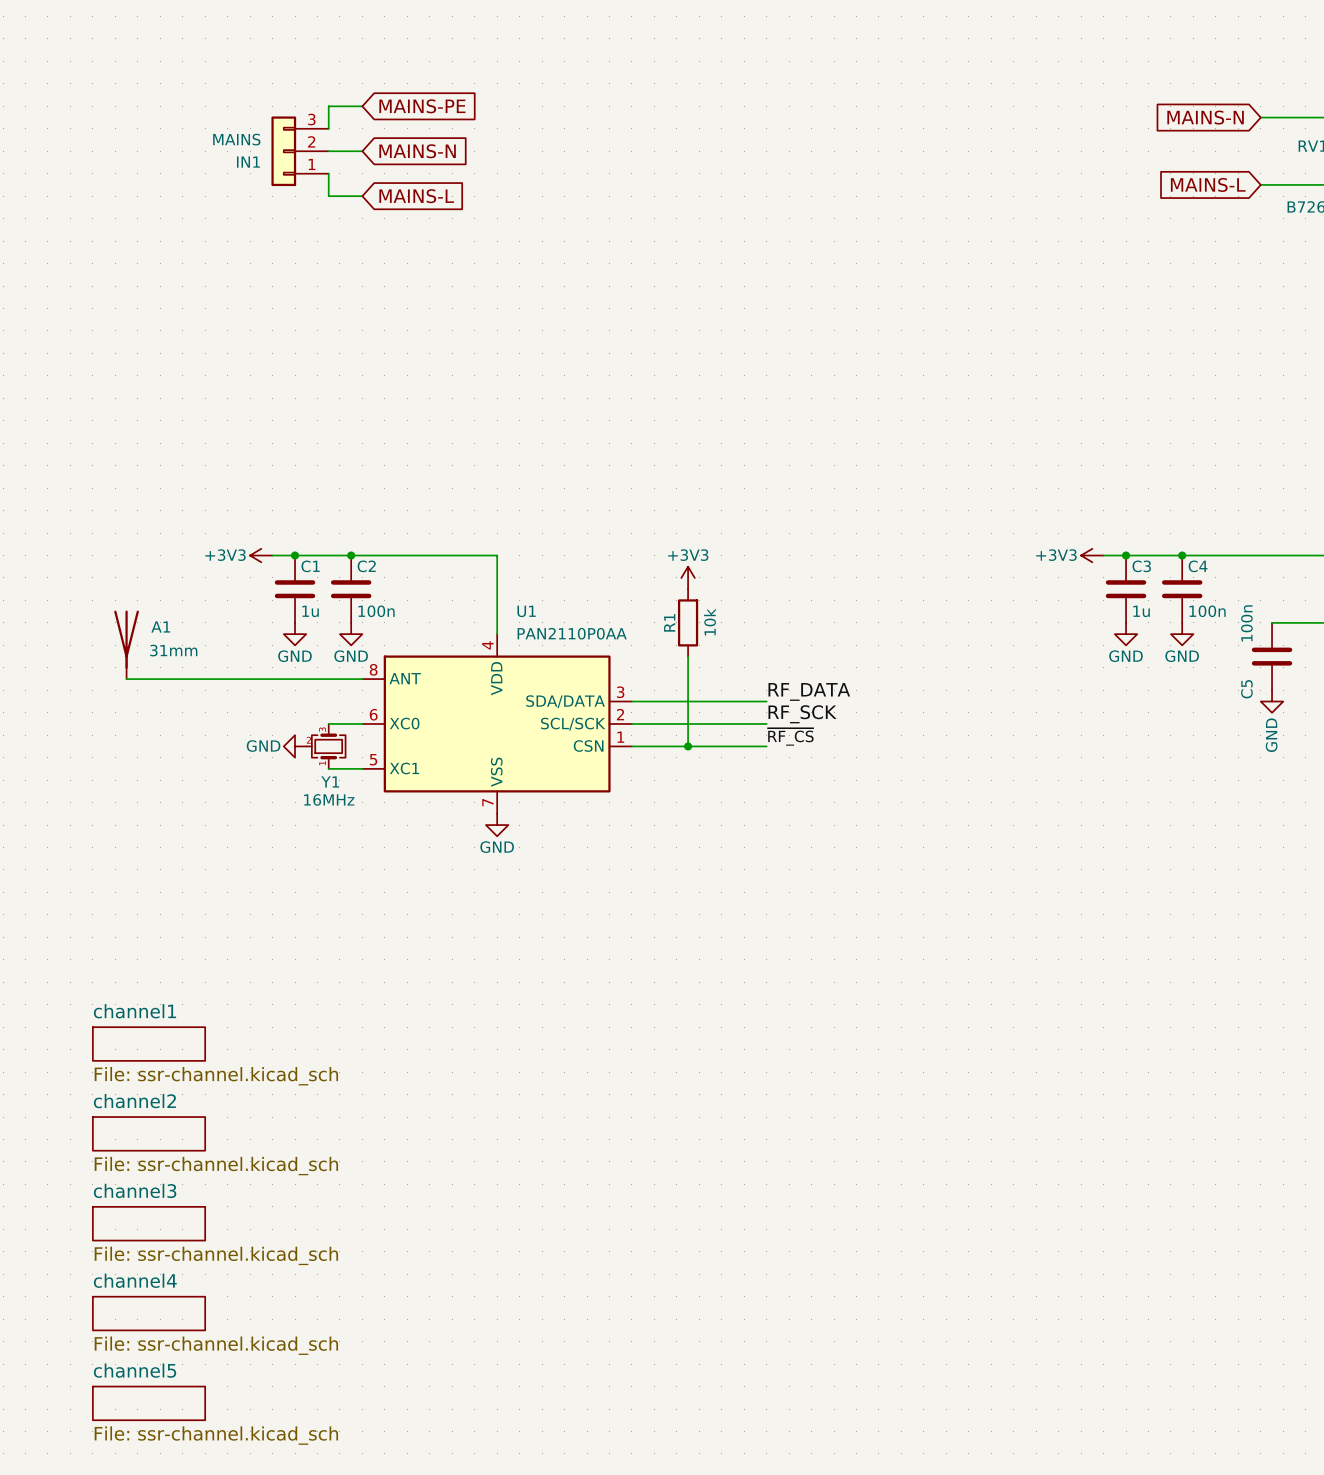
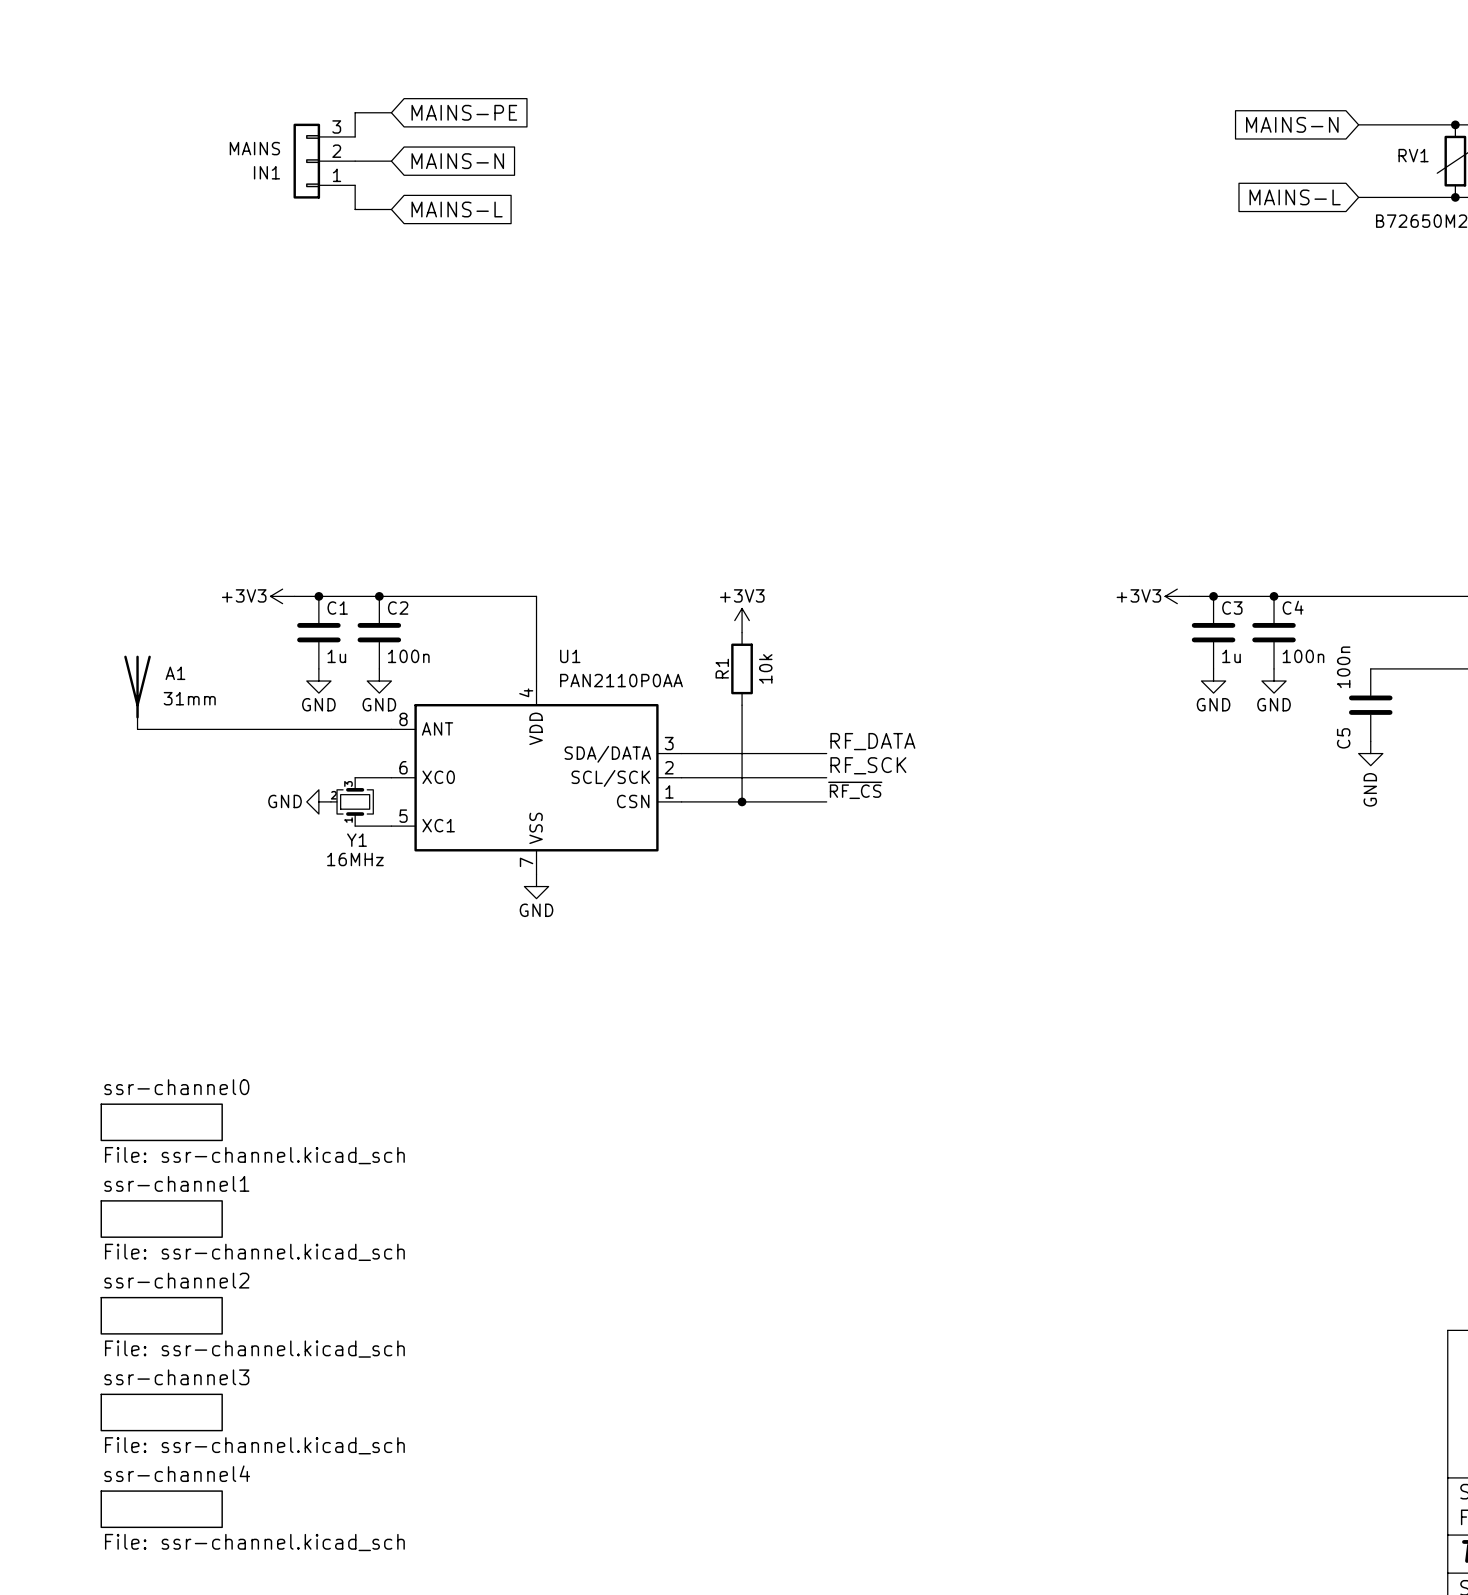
sheet channel1 name: channel1 (134, 1011) -> ssr-channel0 (176, 1087)
sheet channel2 name: channel2 (134, 1101) -> ssr-channel1 (176, 1183)
sheet channel3 name: channel3 (135, 1190) -> ssr-channel2 (176, 1280)
sheet channel4 name: channel4 (135, 1280) -> ssr-channel3 (176, 1377)
sheet channel5 name: channel5 (135, 1370) -> ssr-channel4 (177, 1473)

